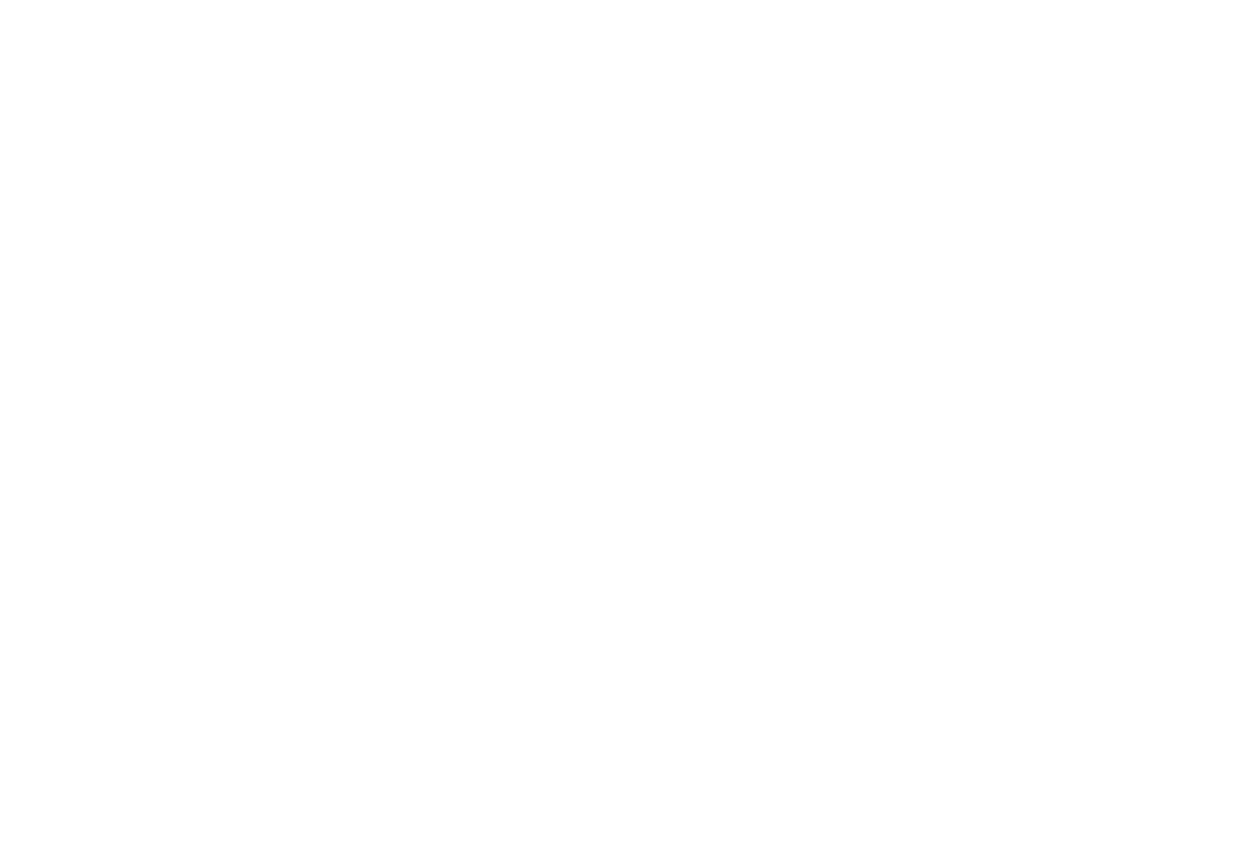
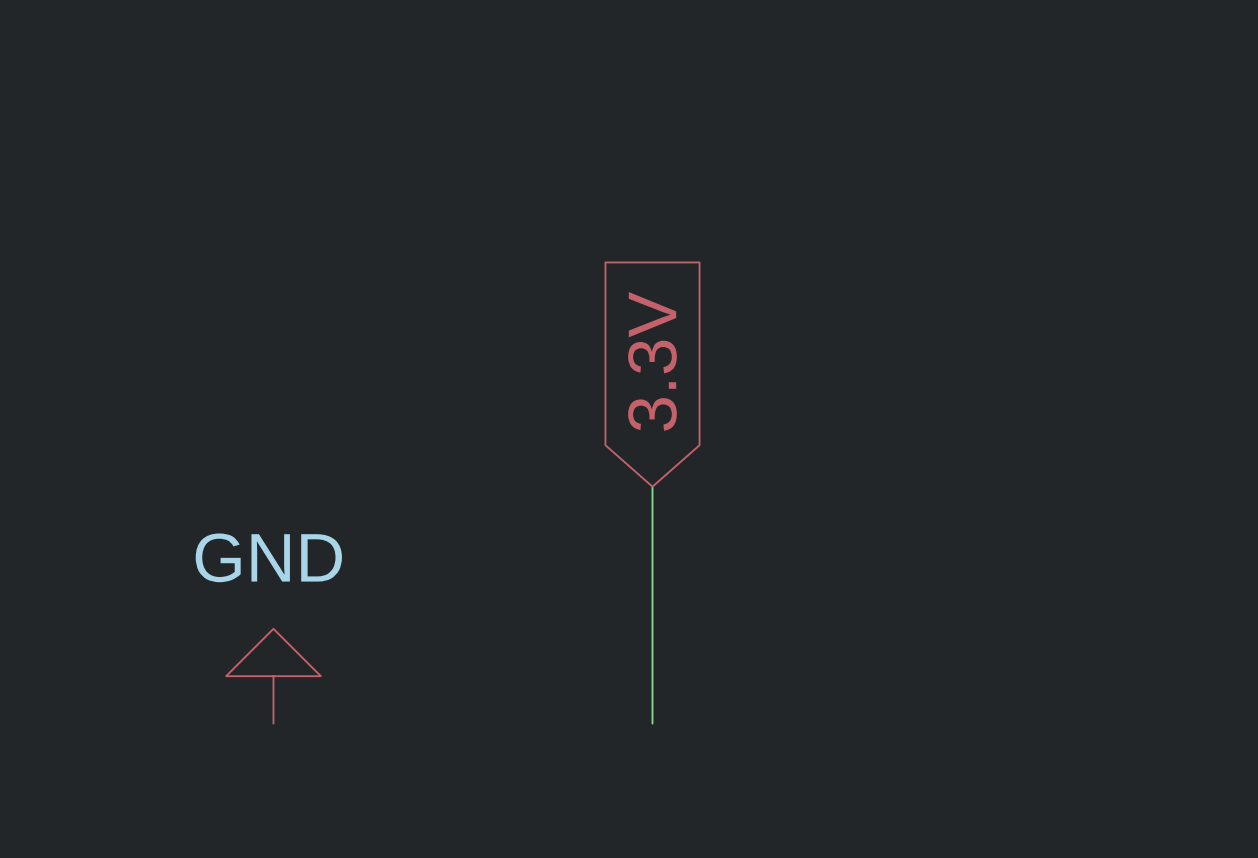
global label: none -> 3.3V (652, 361)
wire: none -> (652, 486) (652, 723)
power symbol: none -> GND (273, 676)

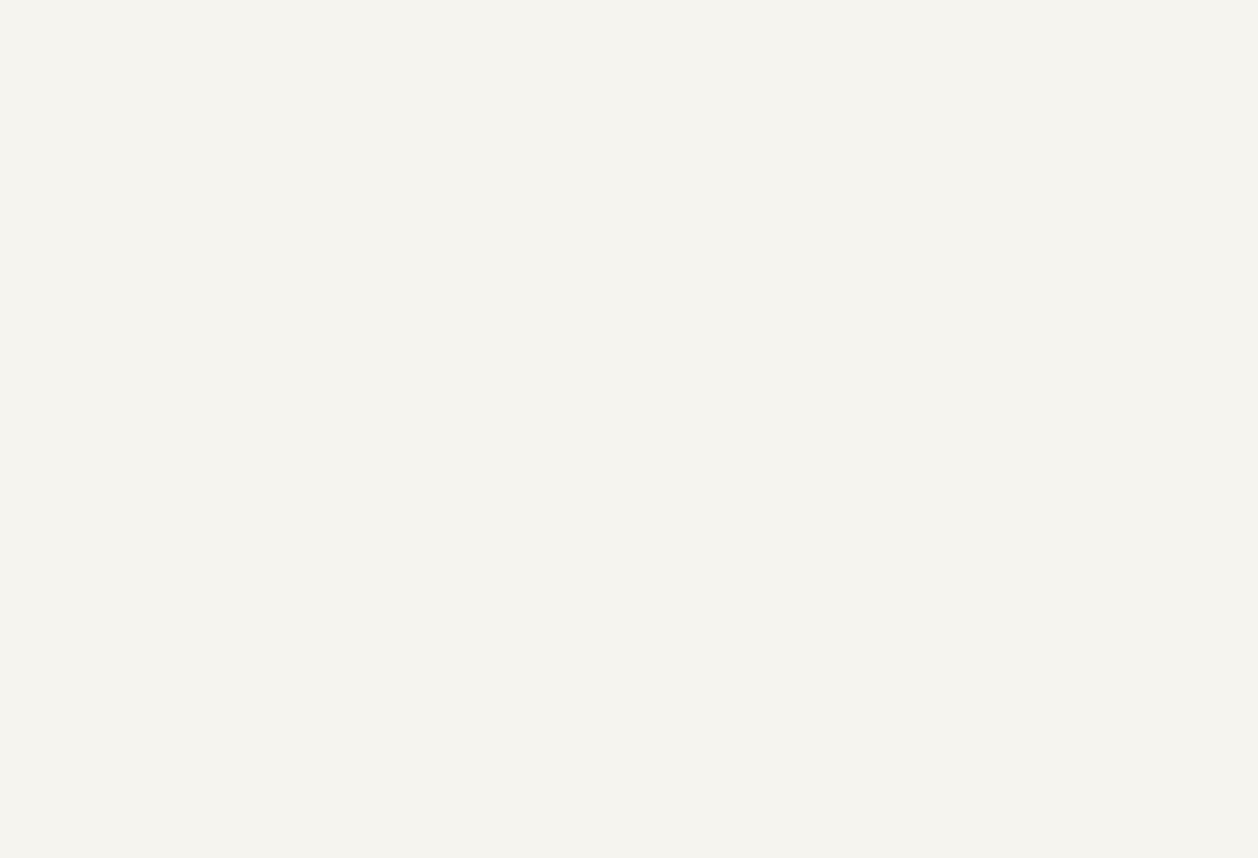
global label: 3.3V (652, 361) -> none
wire: (652, 486) (652, 723) -> none
power symbol: GND (273, 676) -> none

